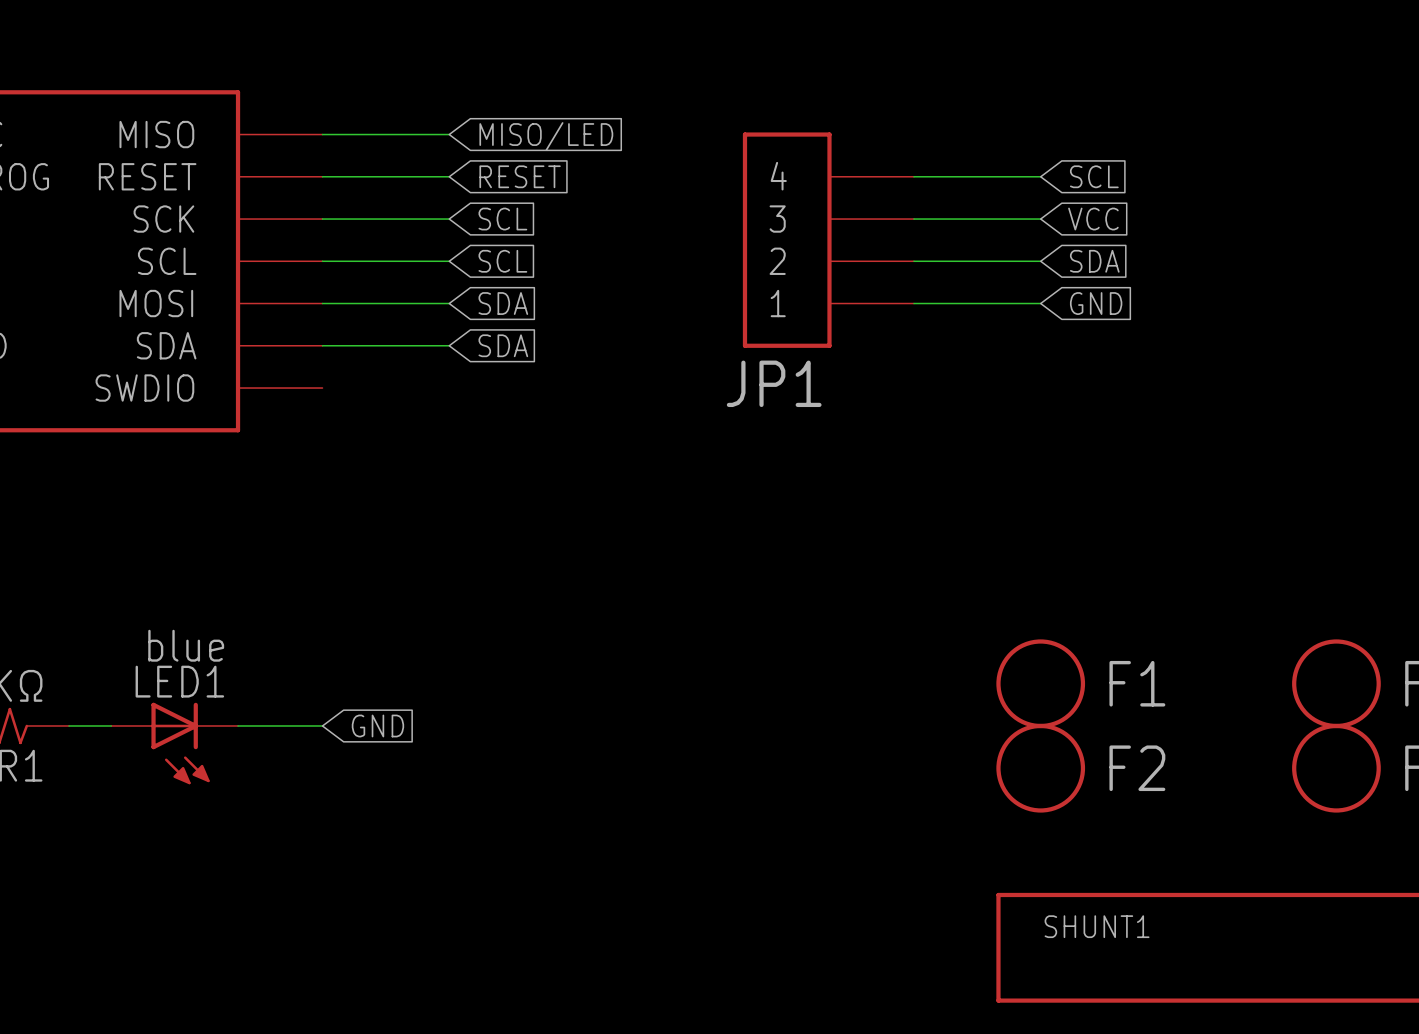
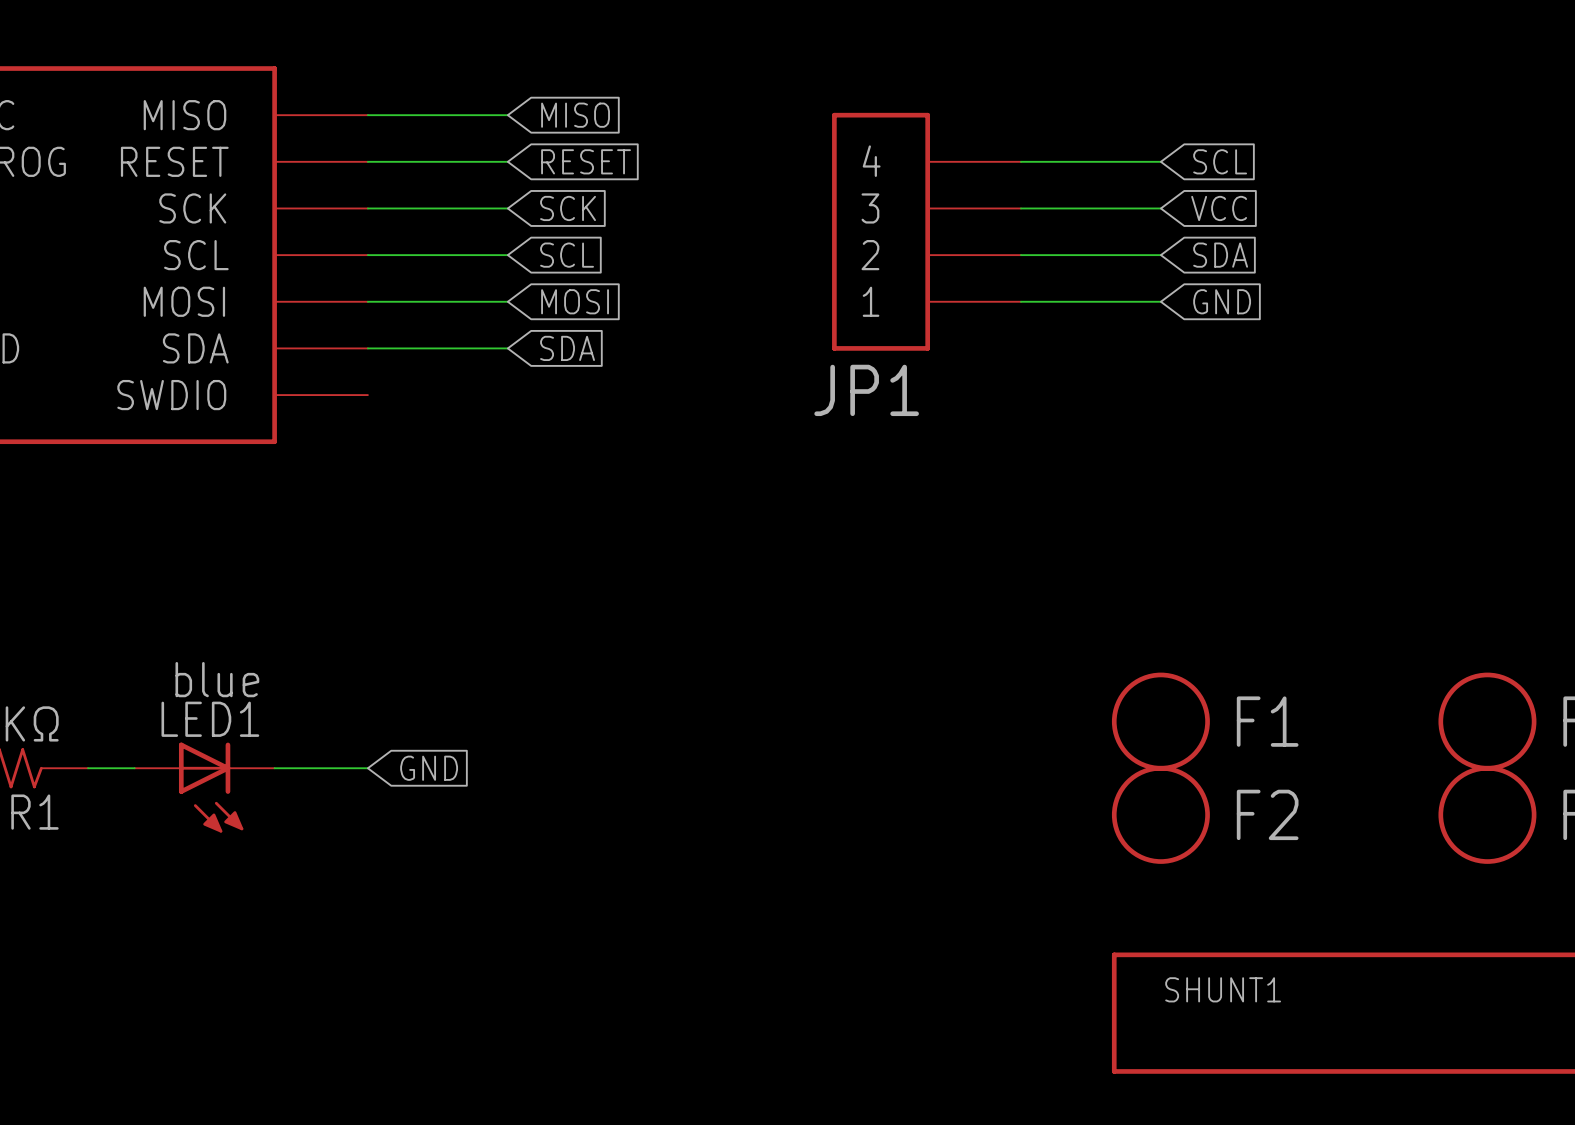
global label: MISO/LED (546, 136) -> MISO (575, 115)
global label: SCL (502, 219) -> SCK (568, 208)
global label: SDA (503, 303) -> MOSI (575, 301)

